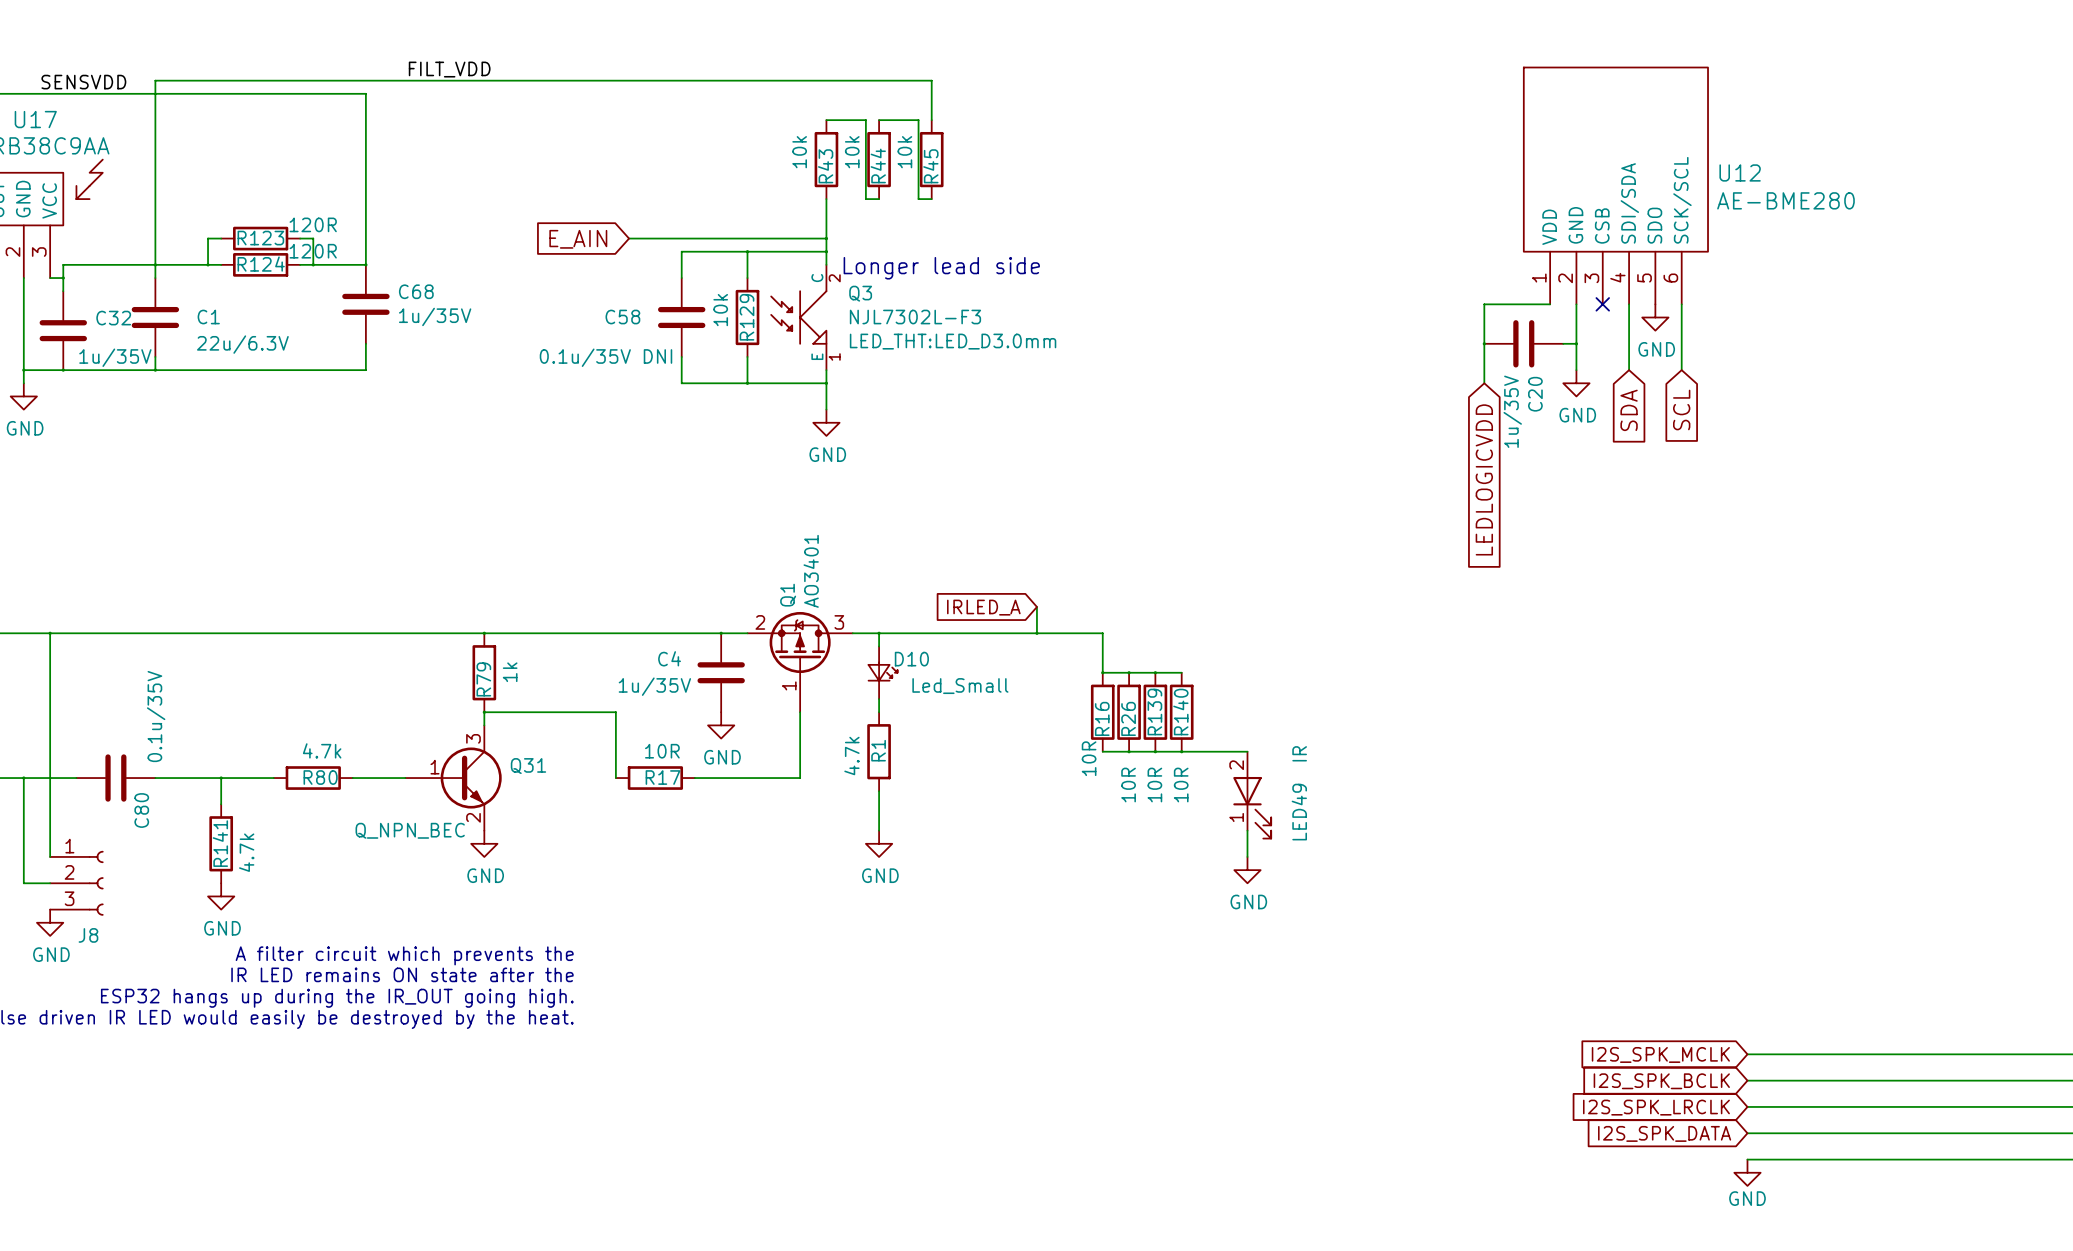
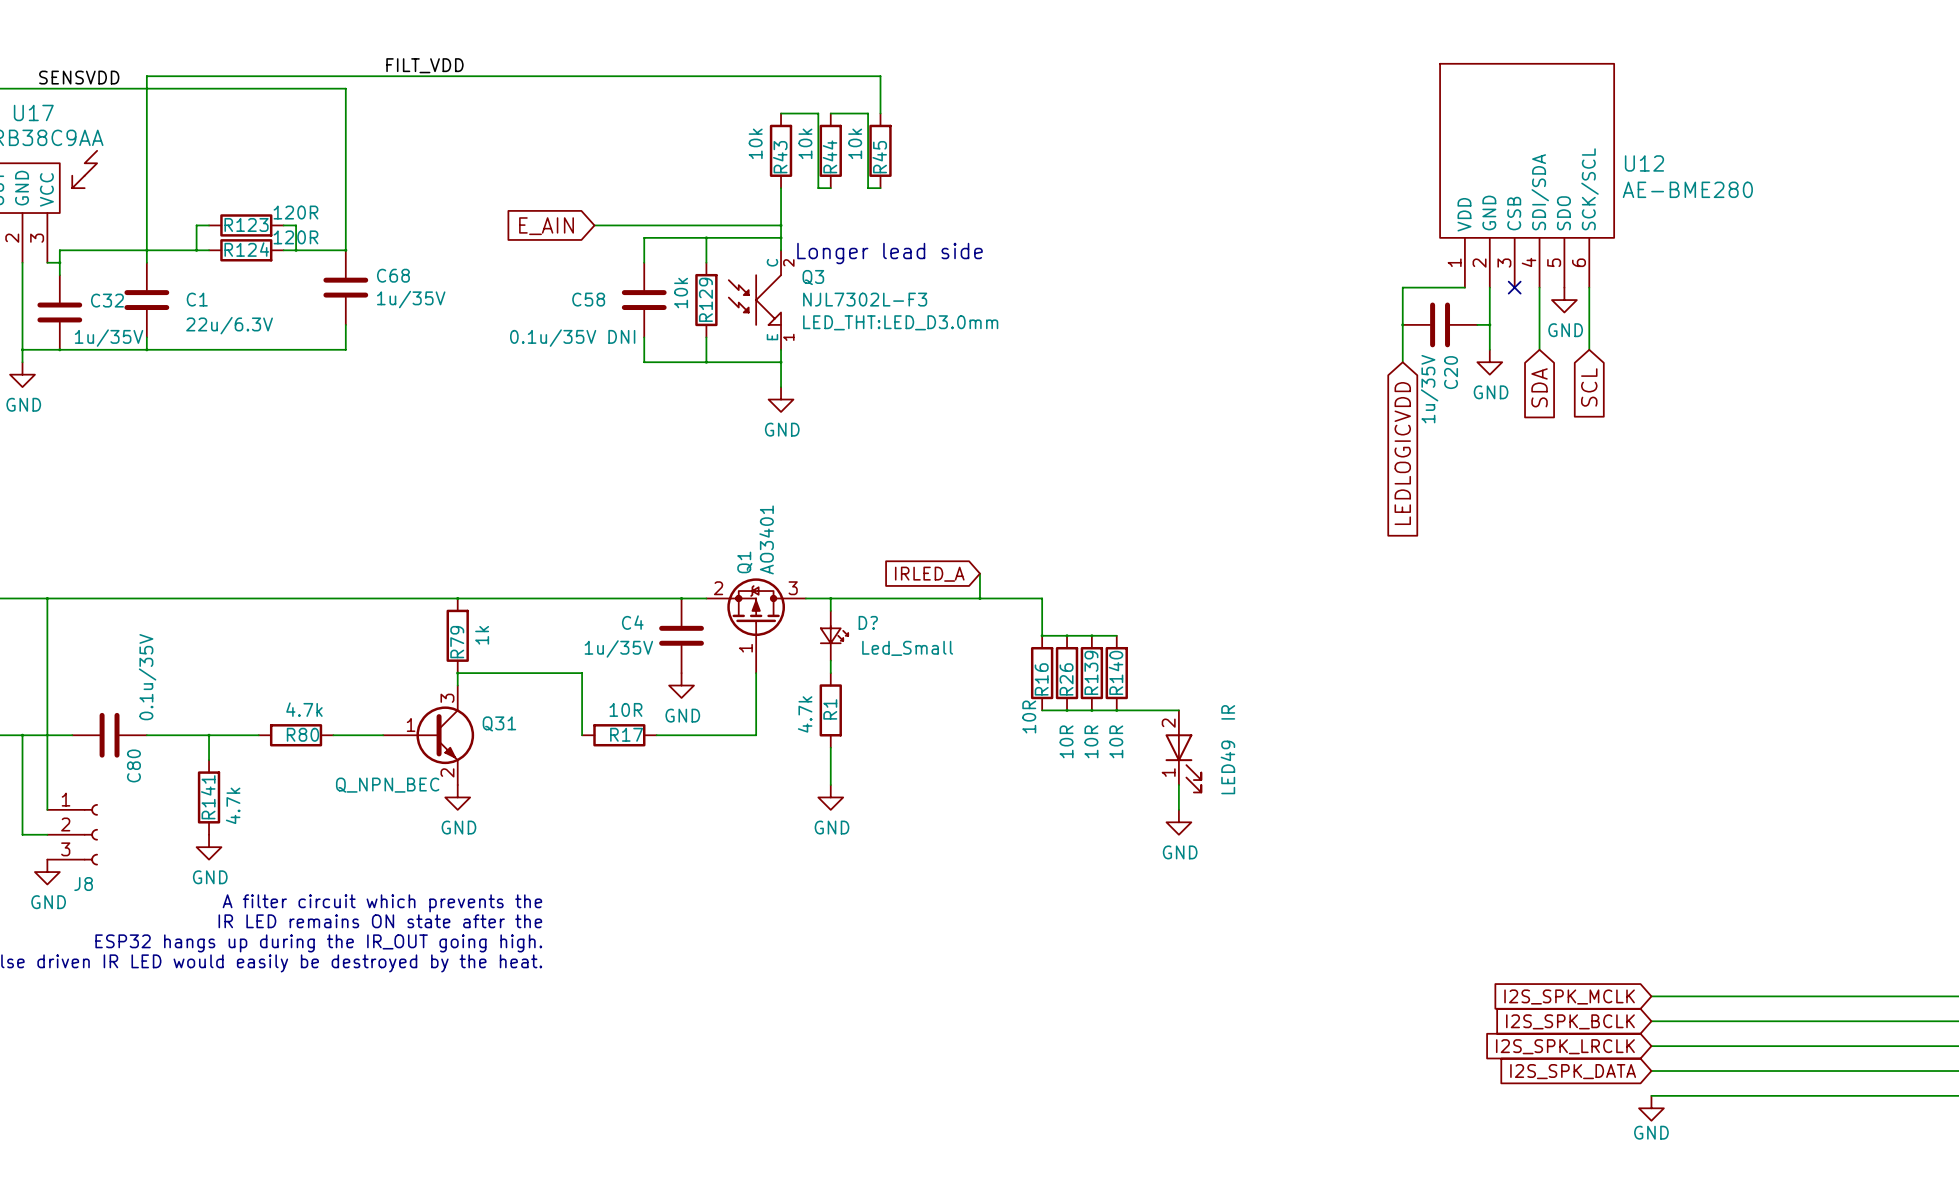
D10 name: D10 (911, 659) -> D? (868, 622)

